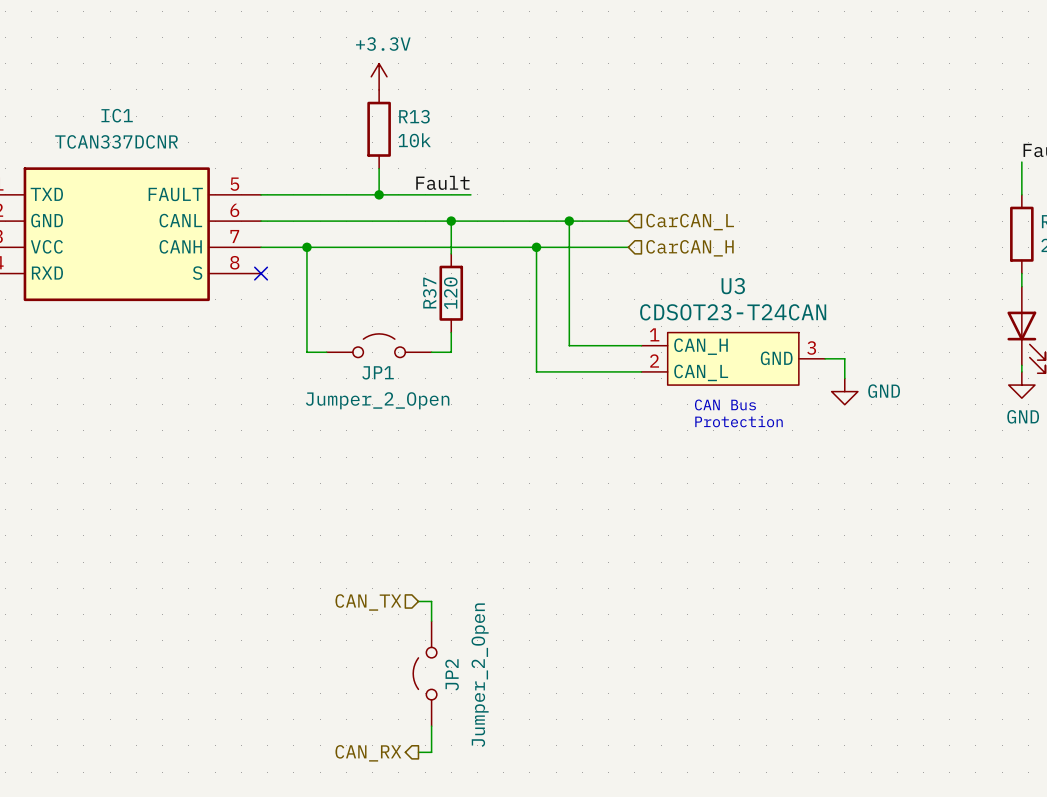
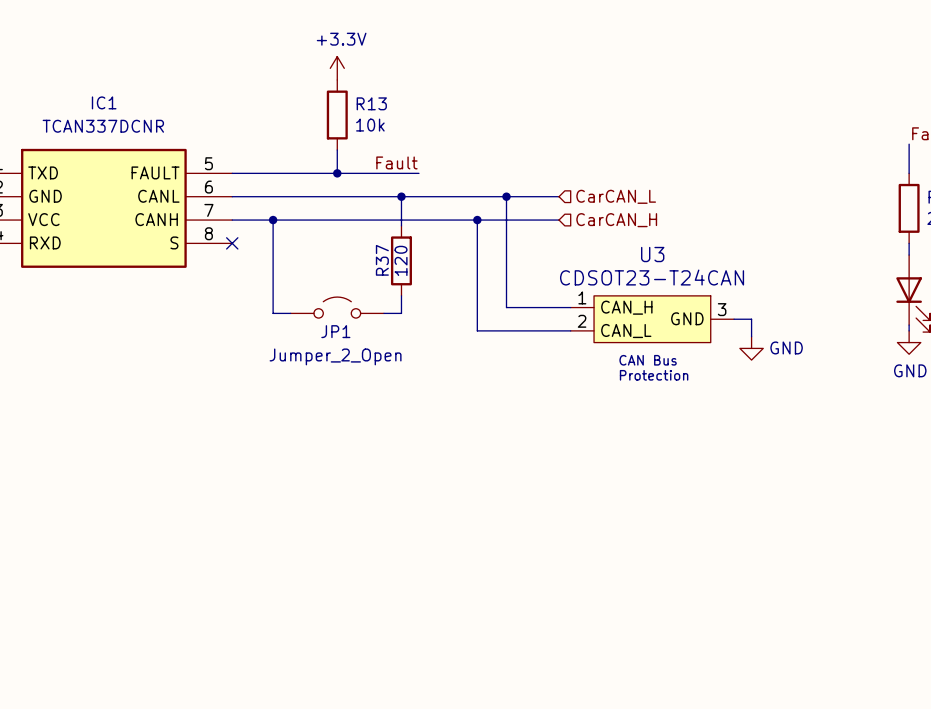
wire: (418, 601) (431, 601) (431, 621) -> none
hierarchical label: CAN_TX (368, 602) -> none
JP2: Jumper_2_Open (425, 673) -> none
wire: (431, 726) (431, 752) (418, 752) -> none
hierarchical label: CAN_RX (368, 753) -> none

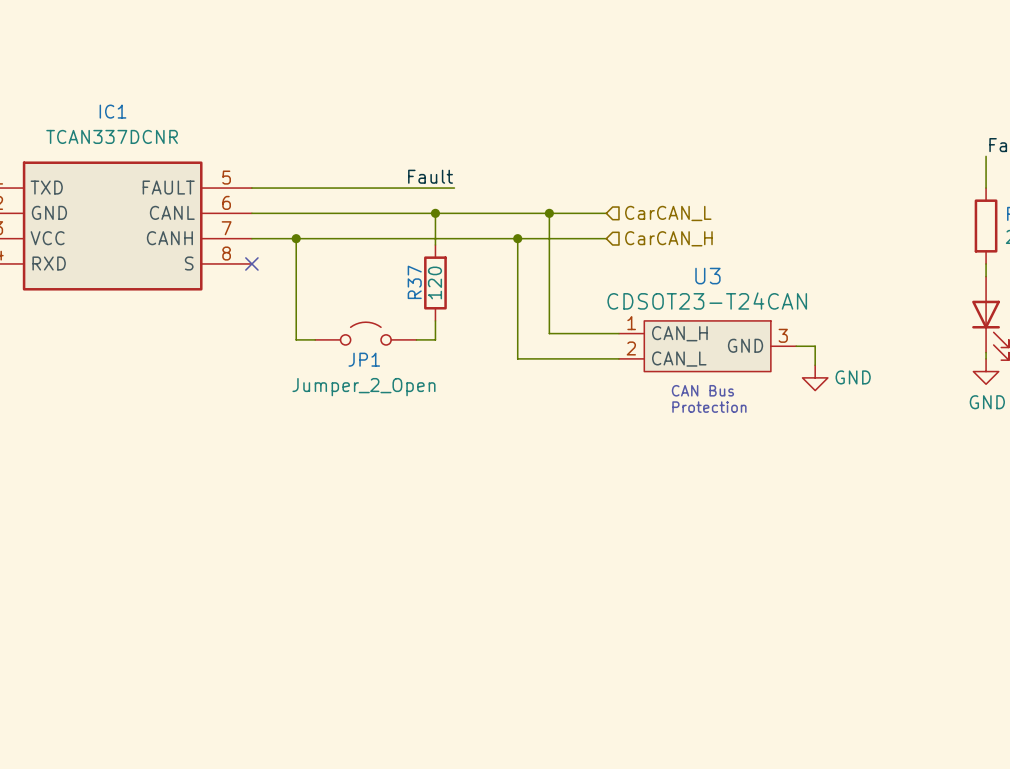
power symbol: +3.3V (337, 68) -> none
R13: 10k (337, 115) -> none
wire: (337, 150) (337, 173) -> none
junction: (337, 173) -> none

